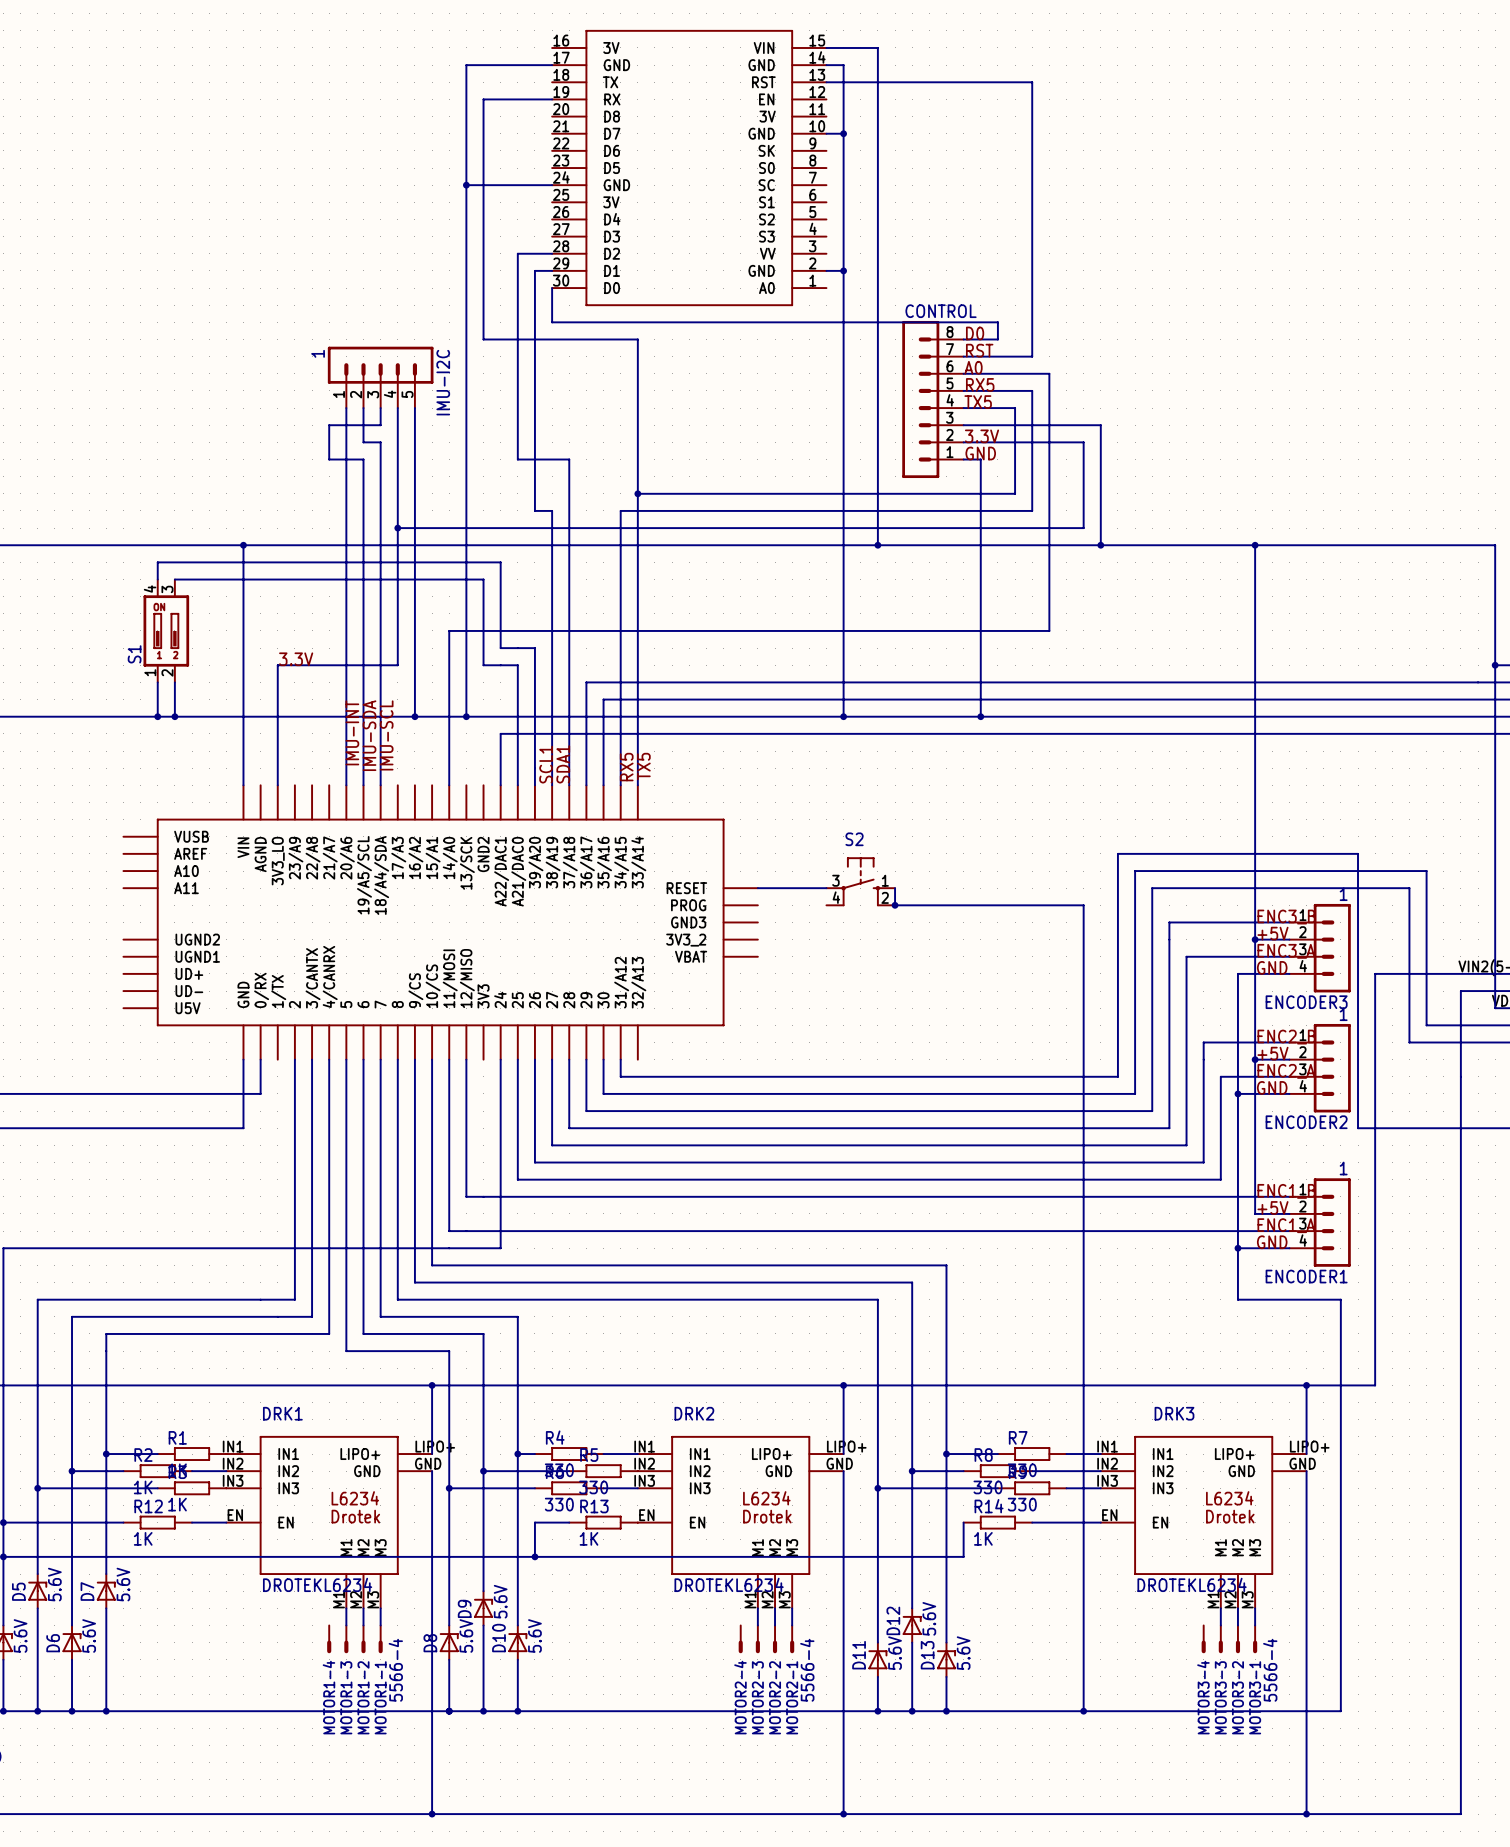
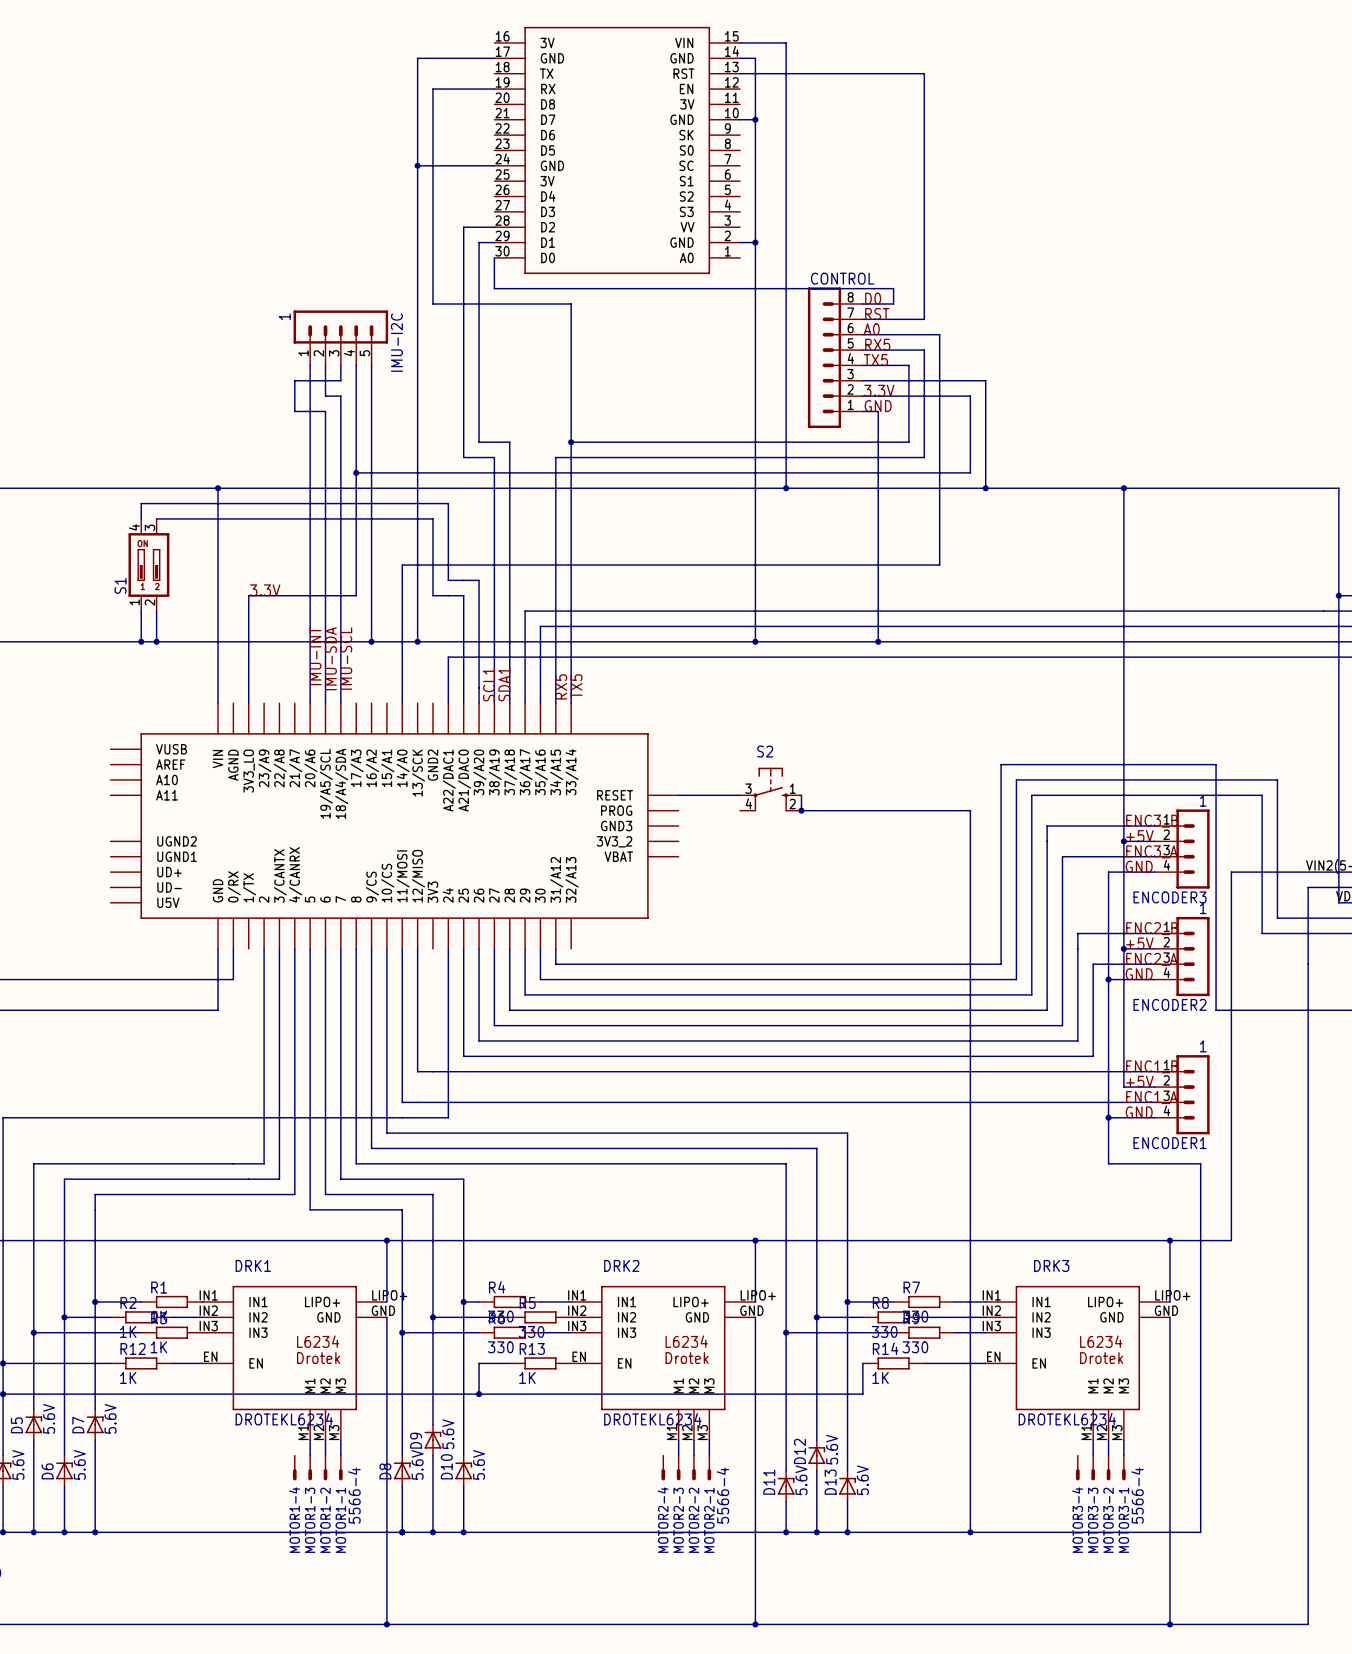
wire: (517, 459) (569, 459) (569, 493) -> (463, 411) (463, 457) (479, 457)
wire: (534, 493) (534, 510) -> (479, 442) (509, 442)

